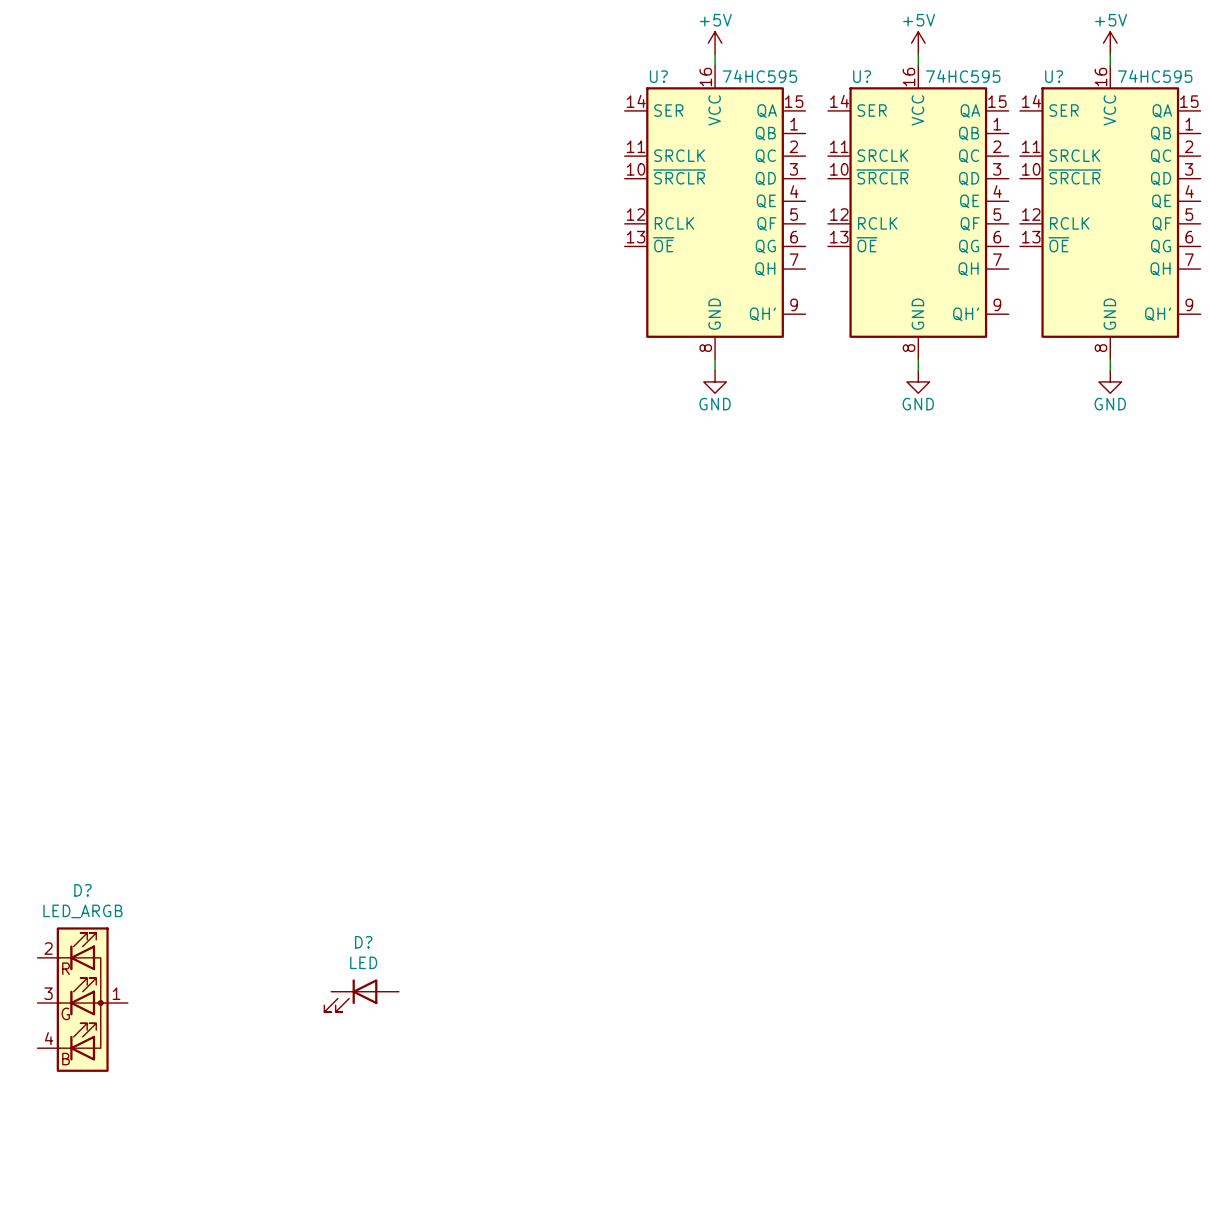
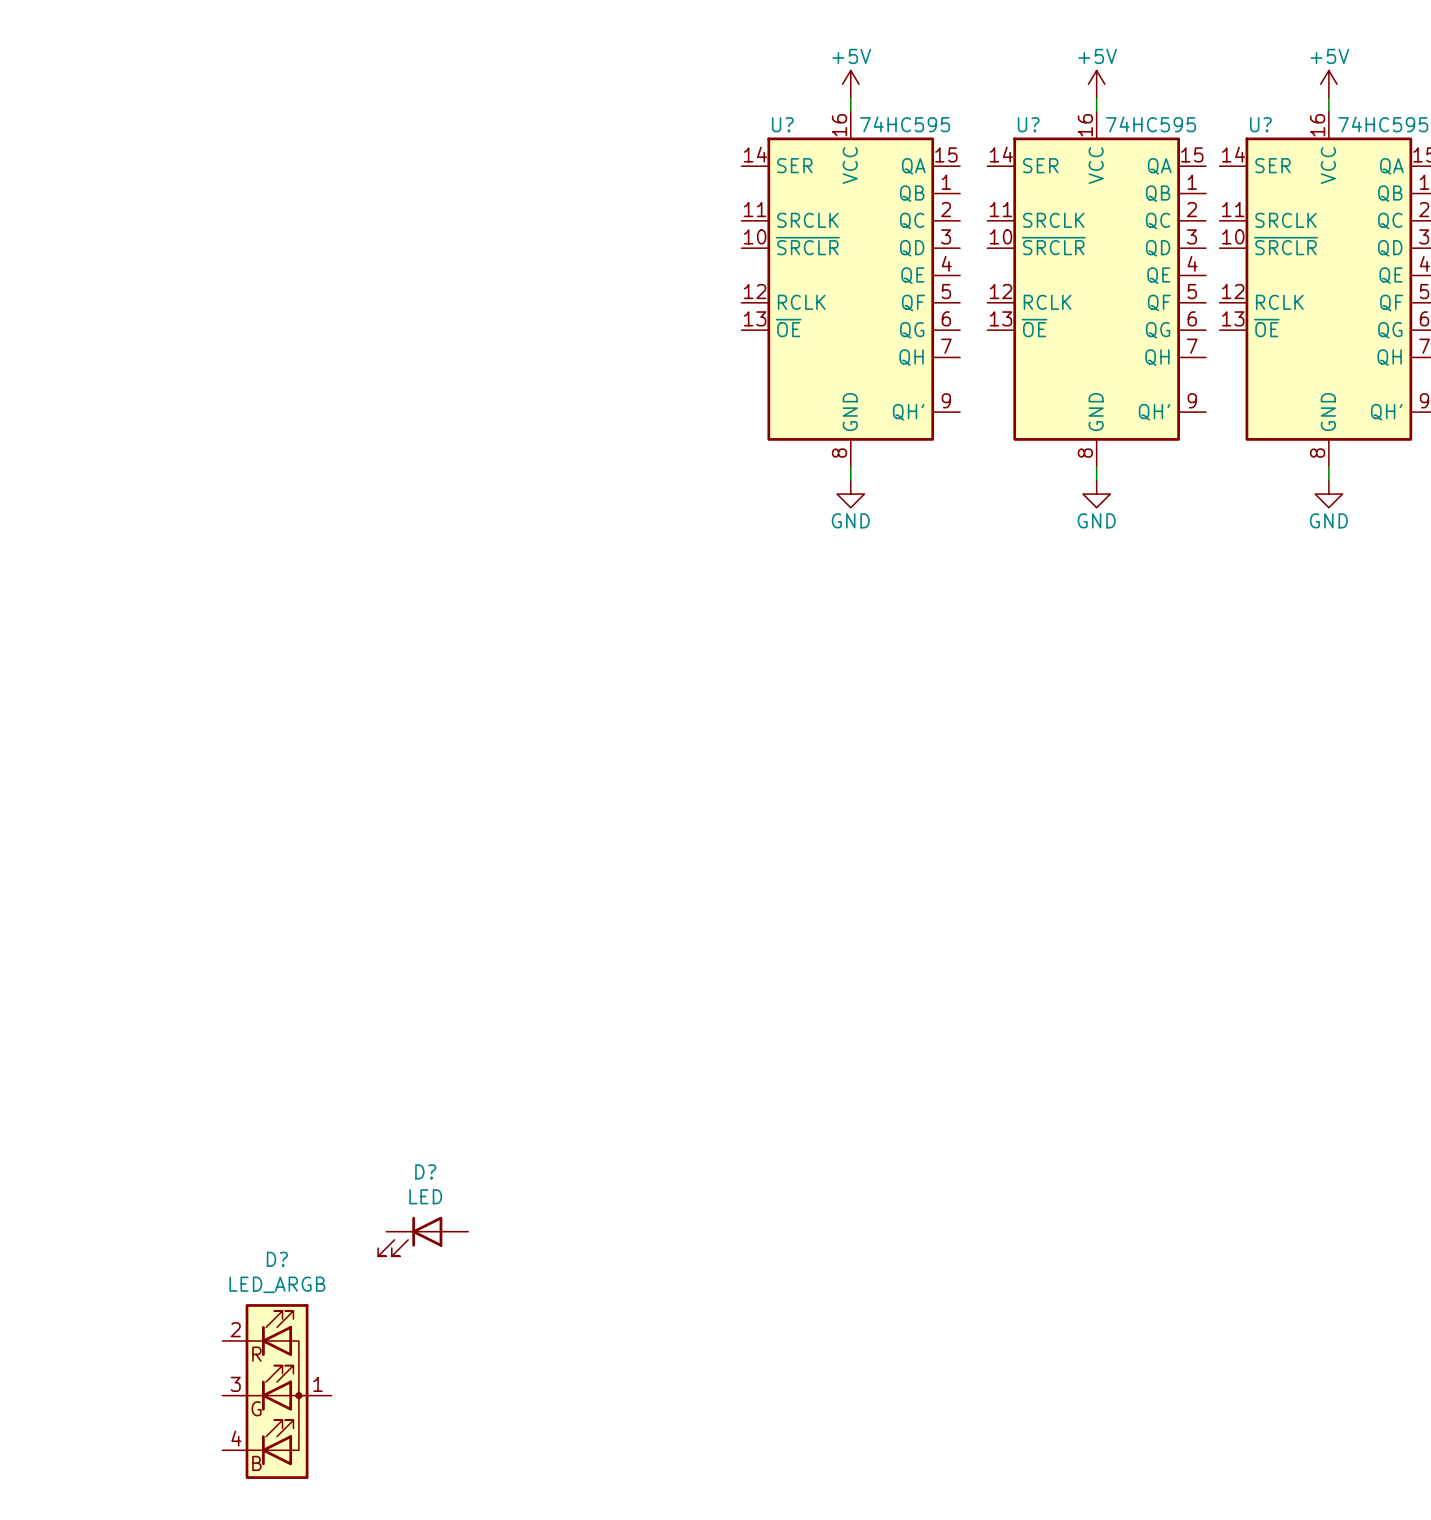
D? position: (82, 999) -> (277, 1391)

